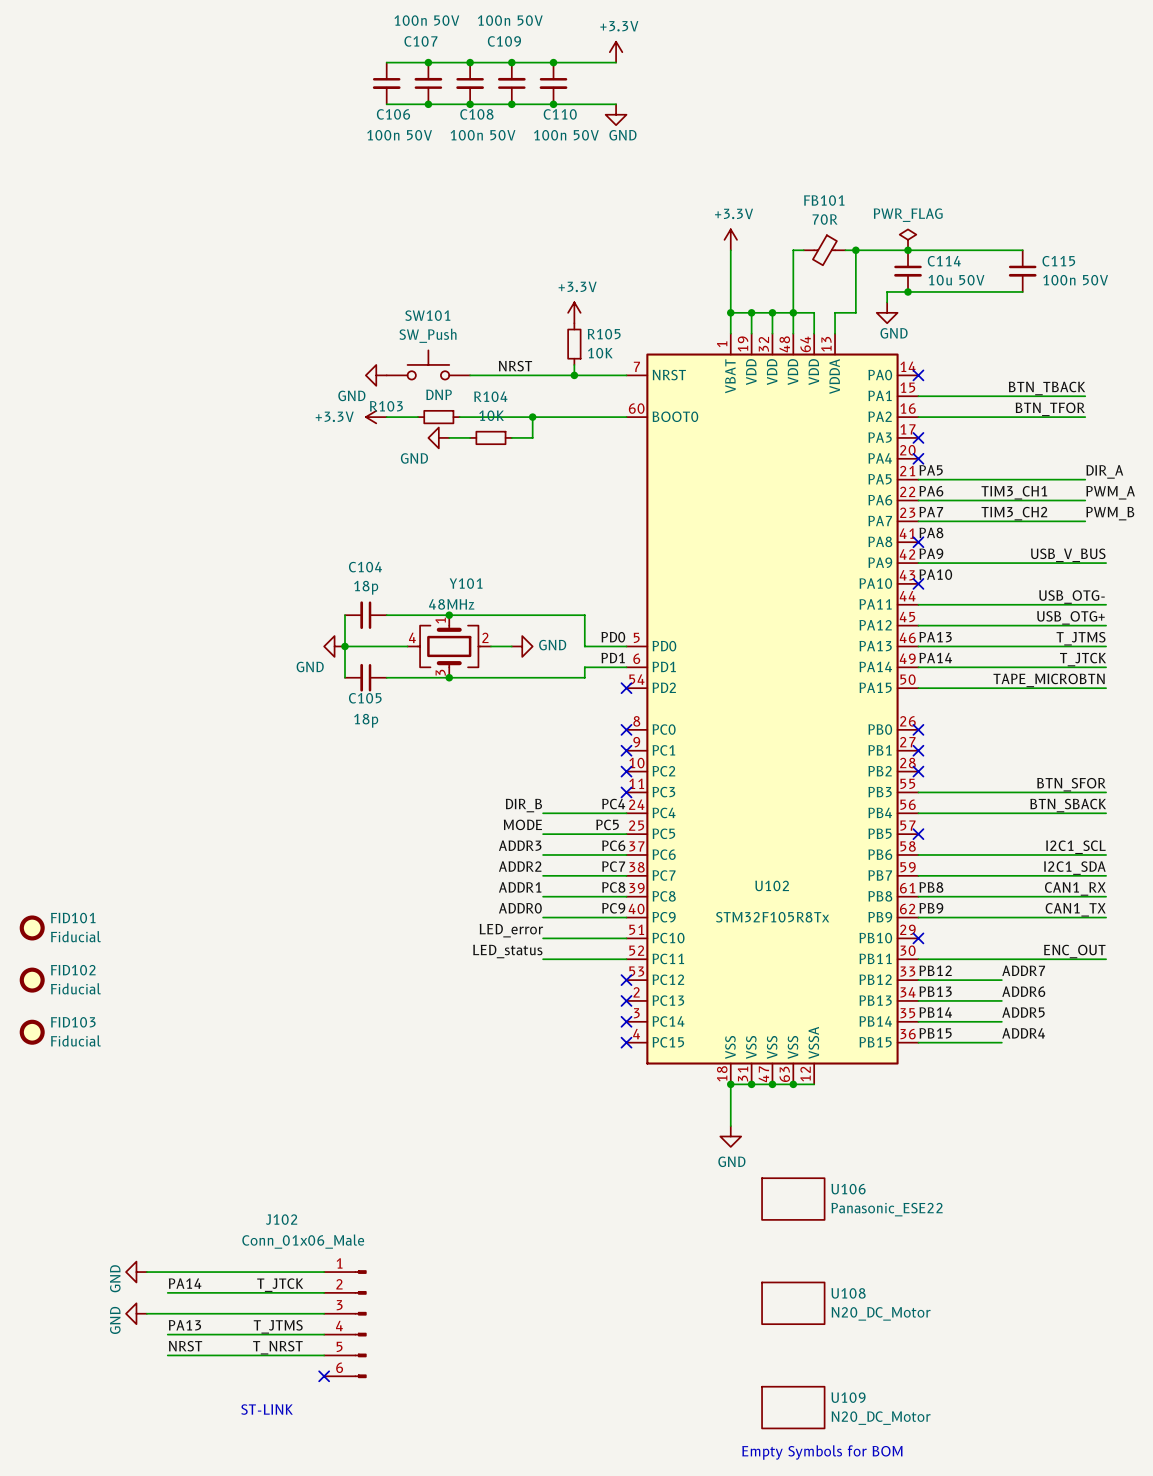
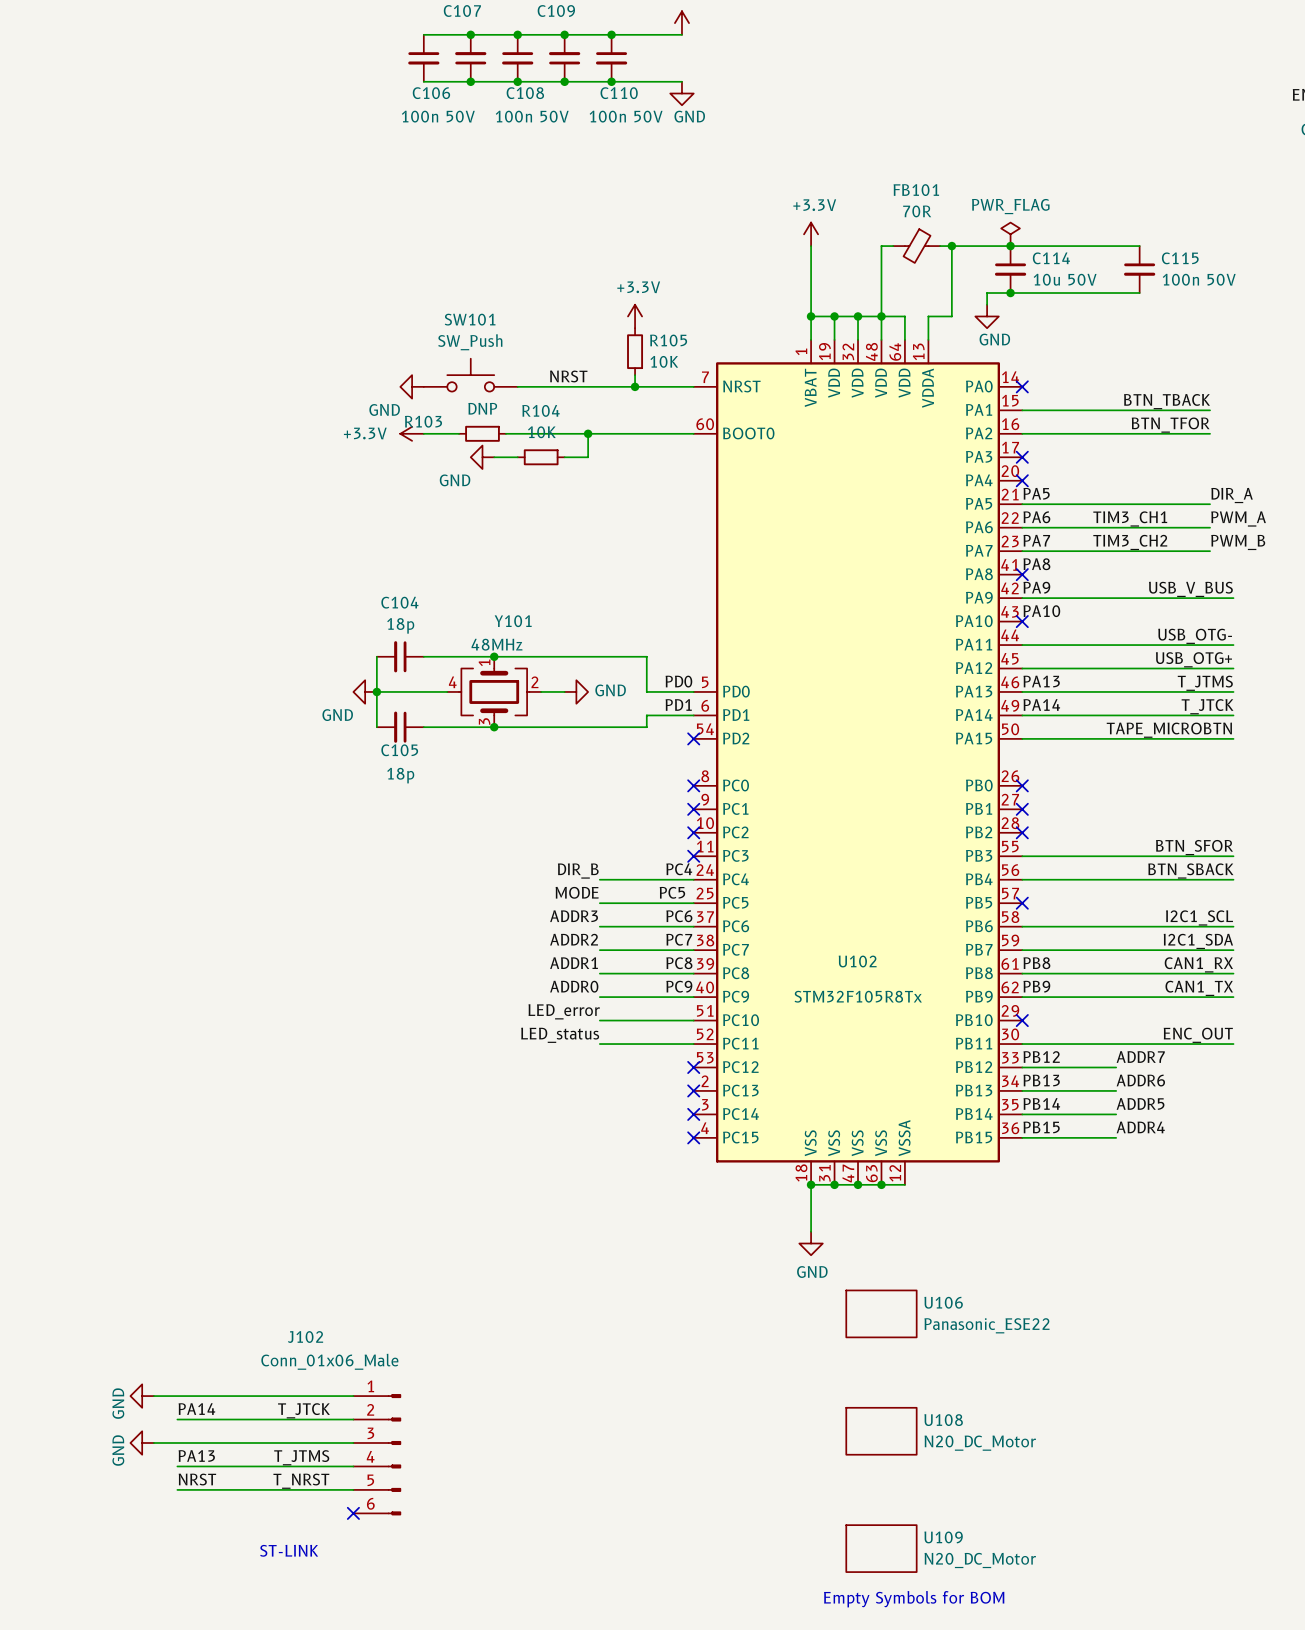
FID101: Fiducial (32, 927) -> none
FID102: Fiducial (32, 980) -> none
FID103: Fiducial (32, 1032) -> none

